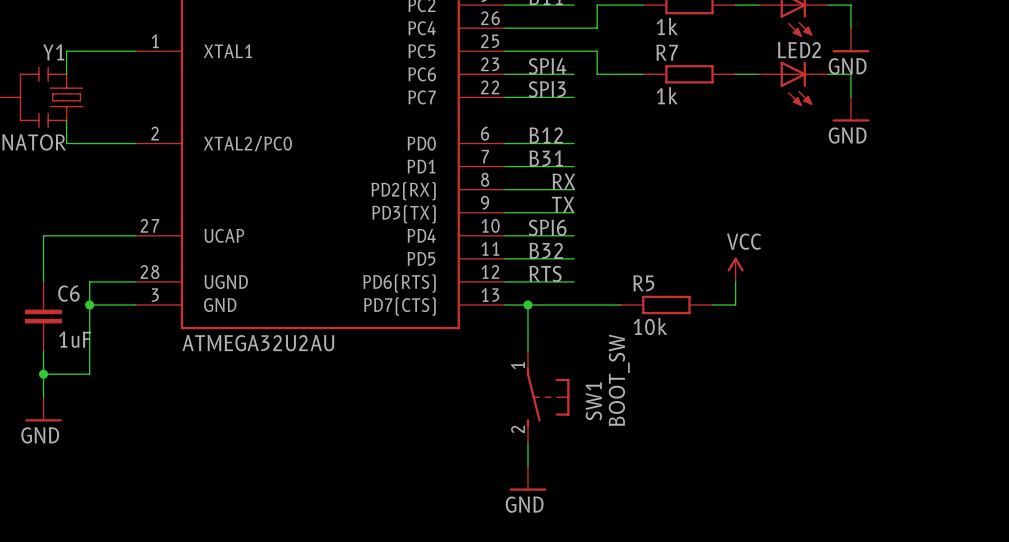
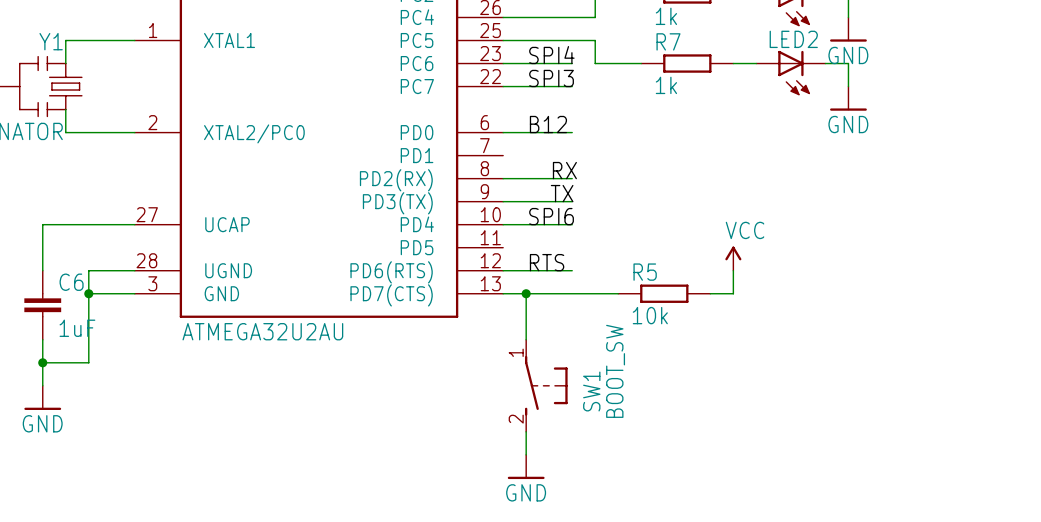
label: B31 (546, 158) -> none
wire: (504, 166) (574, 166) -> none
label: B32 (546, 250) -> none
wire: (504, 258) (574, 258) -> none

